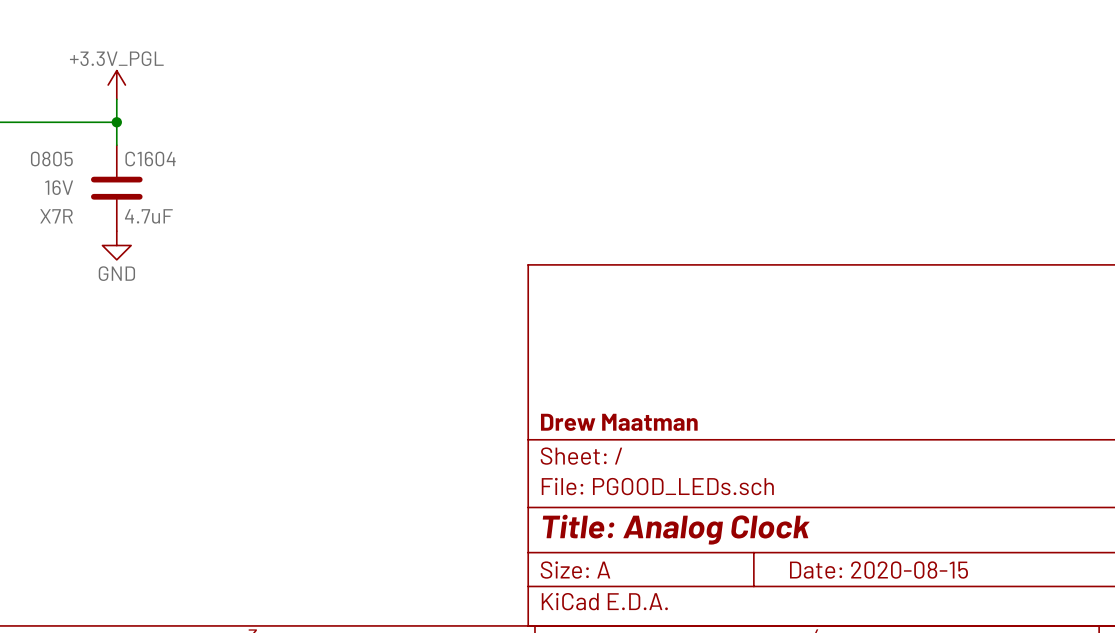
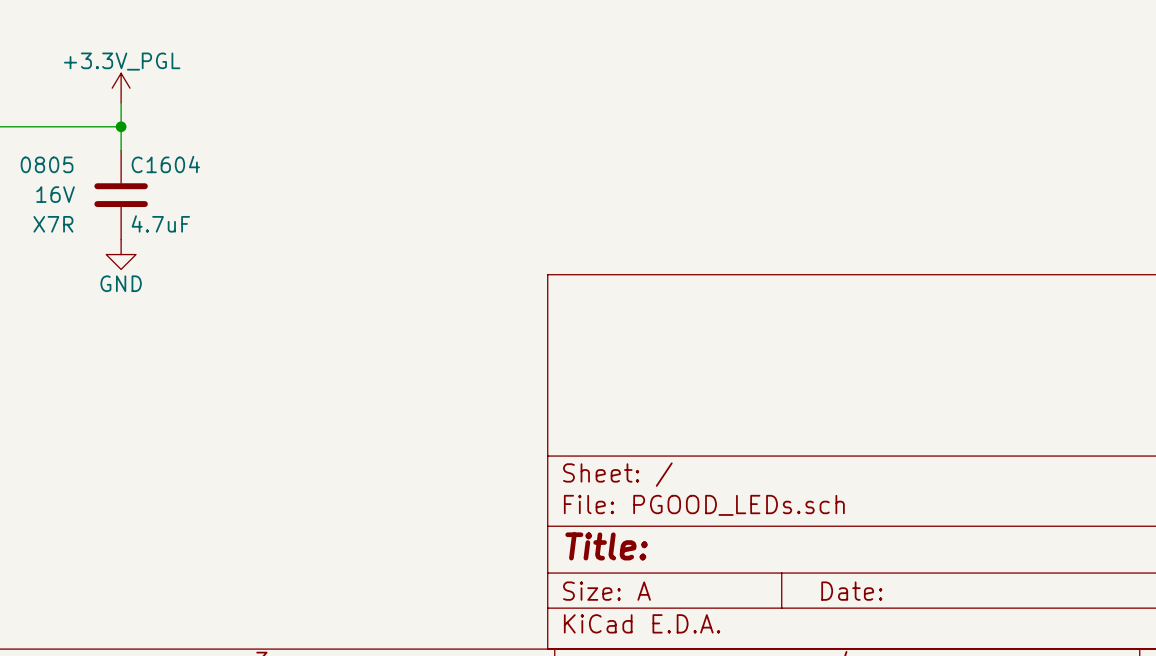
title block: Drew Maatman (619, 422) -> none
title block: Title: Analog Clock (676, 529) -> Title: (606, 546)
title block: Date: 2020-08-15 (878, 570) -> Date: (851, 591)

